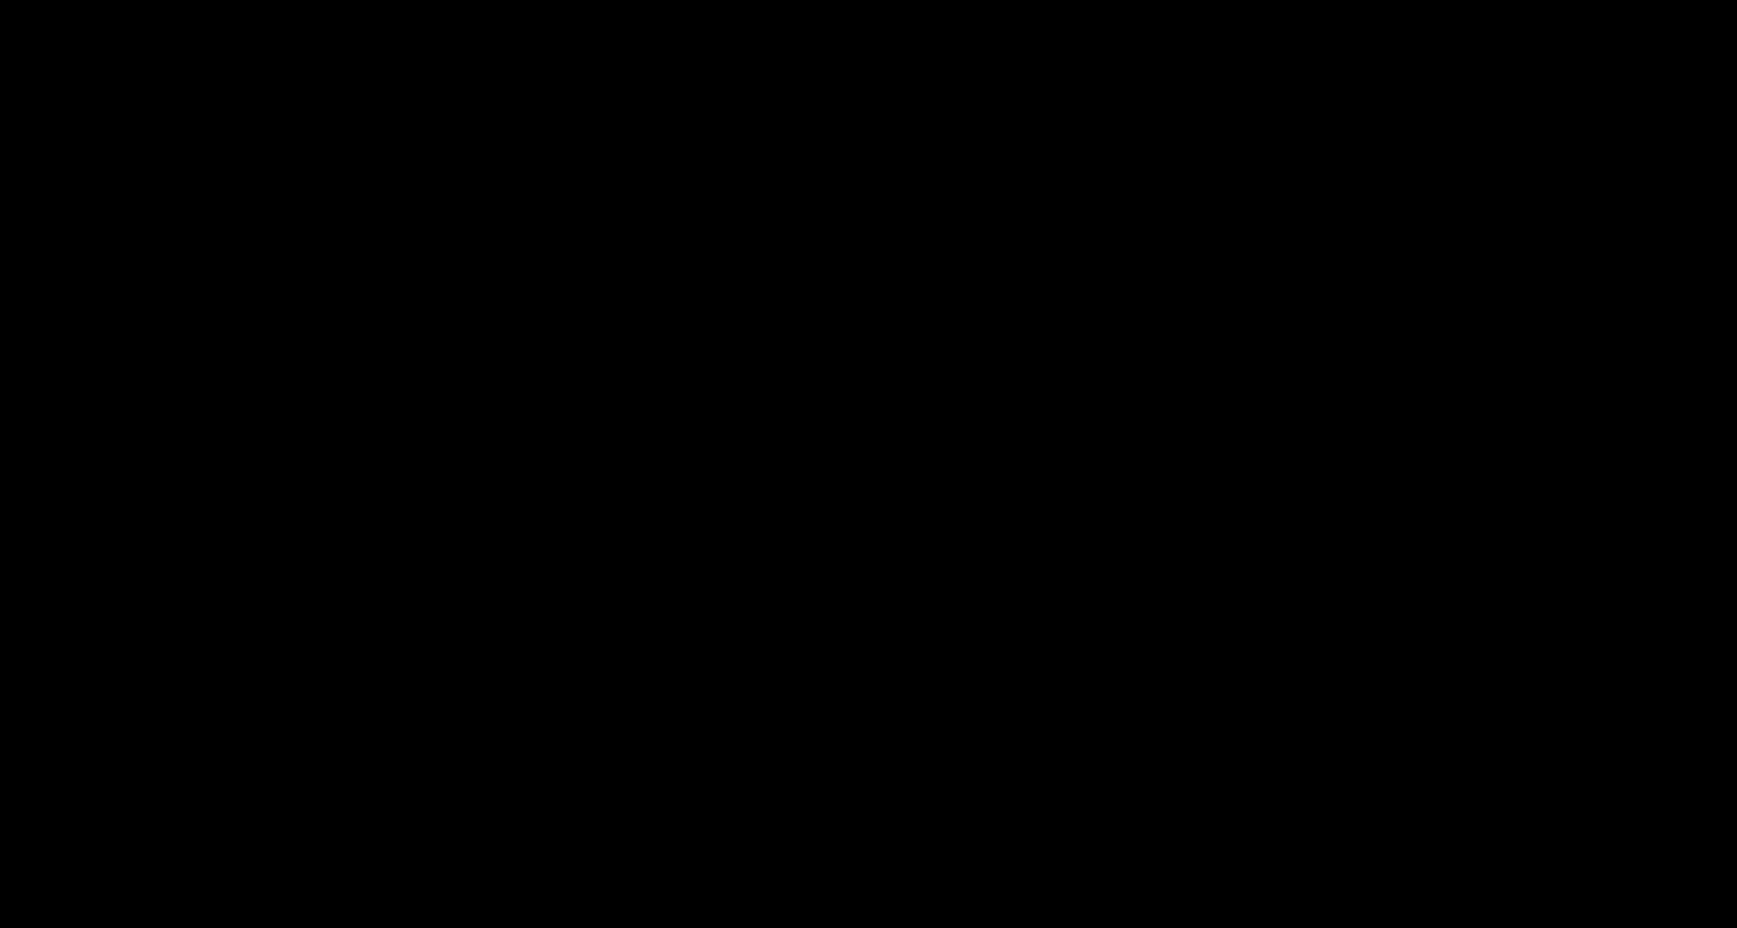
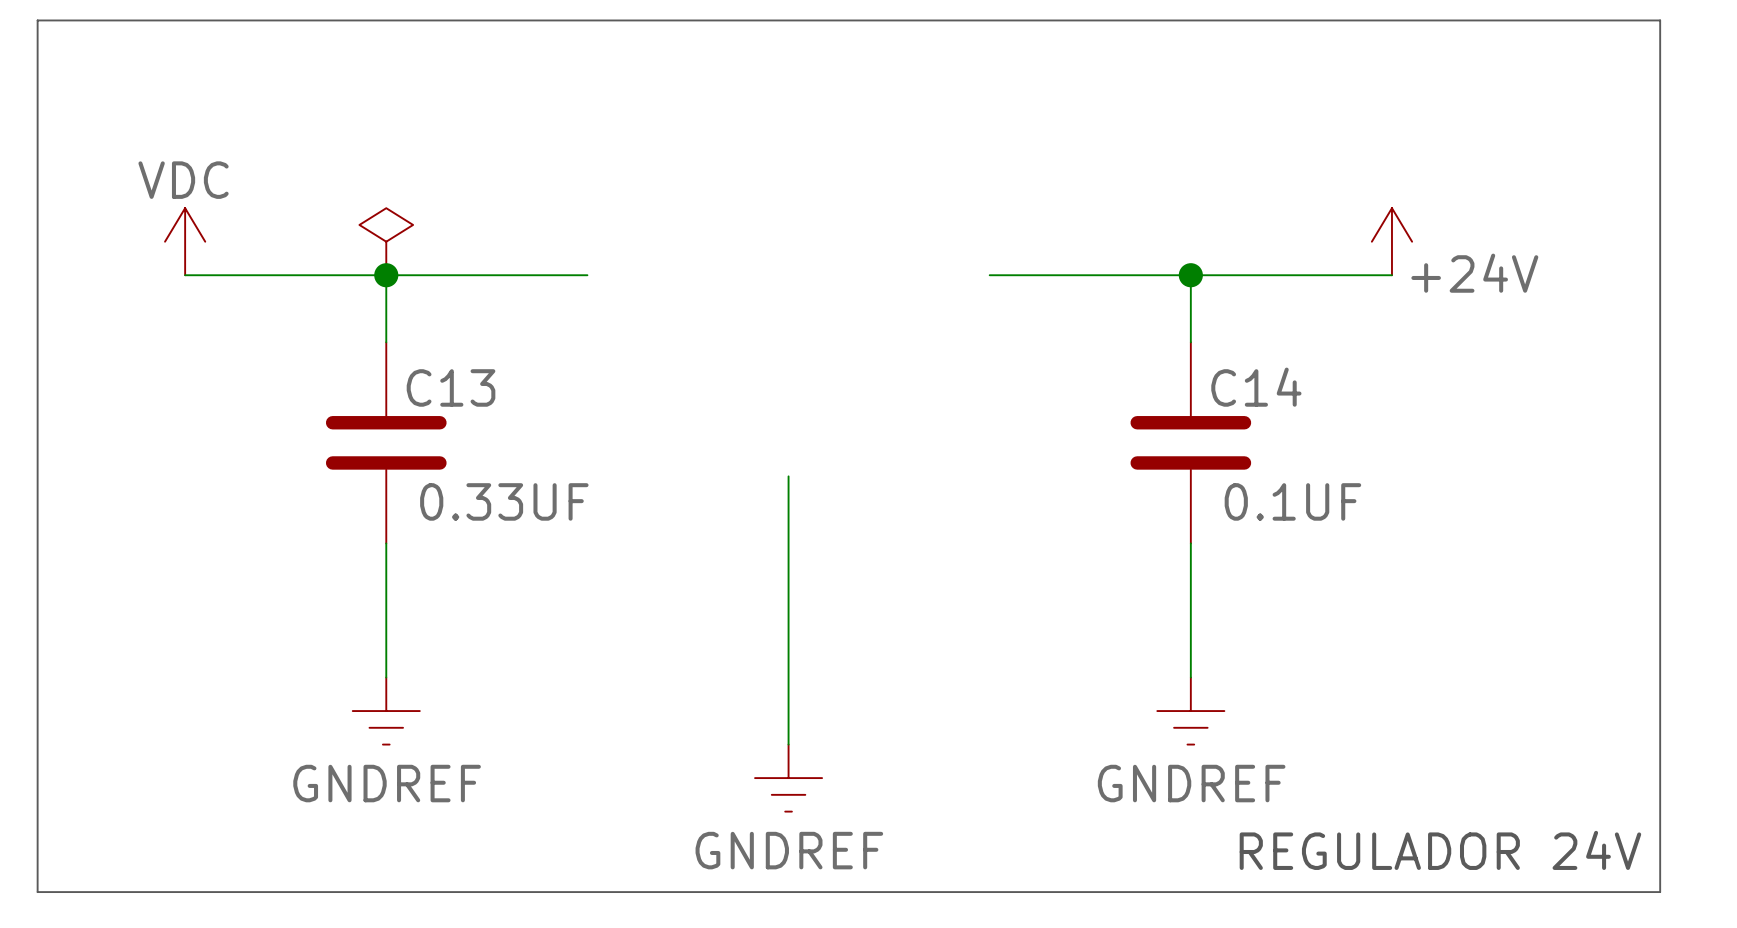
line: none -> (37, 20) (1660, 20) (1660, 892) (37, 892) (37, 20)
power symbol: none -> VDC (185, 241)
power symbol: none -> (386, 241)
power symbol: none -> +24V (1391, 241)
wire: none -> (185, 275) (587, 275)
wire: none -> (386, 275) (386, 342)
junction: none -> (386, 275)
wire: none -> (989, 275) (1391, 275)
wire: none -> (1190, 275) (1190, 342)
junction: none -> (1190, 275)
C13: none -> 0.33UF (386, 442)
C14: none -> 0.1UF (1190, 442)
wire: none -> (788, 476) (788, 744)
wire: none -> (386, 543) (386, 677)
wire: none -> (1190, 543) (1190, 677)
power symbol: none -> GNDREF (386, 711)
power symbol: none -> GNDREF (1190, 711)
power symbol: none -> GNDREF (788, 778)
text: none -> REGULADOR 24V (1440, 850)

